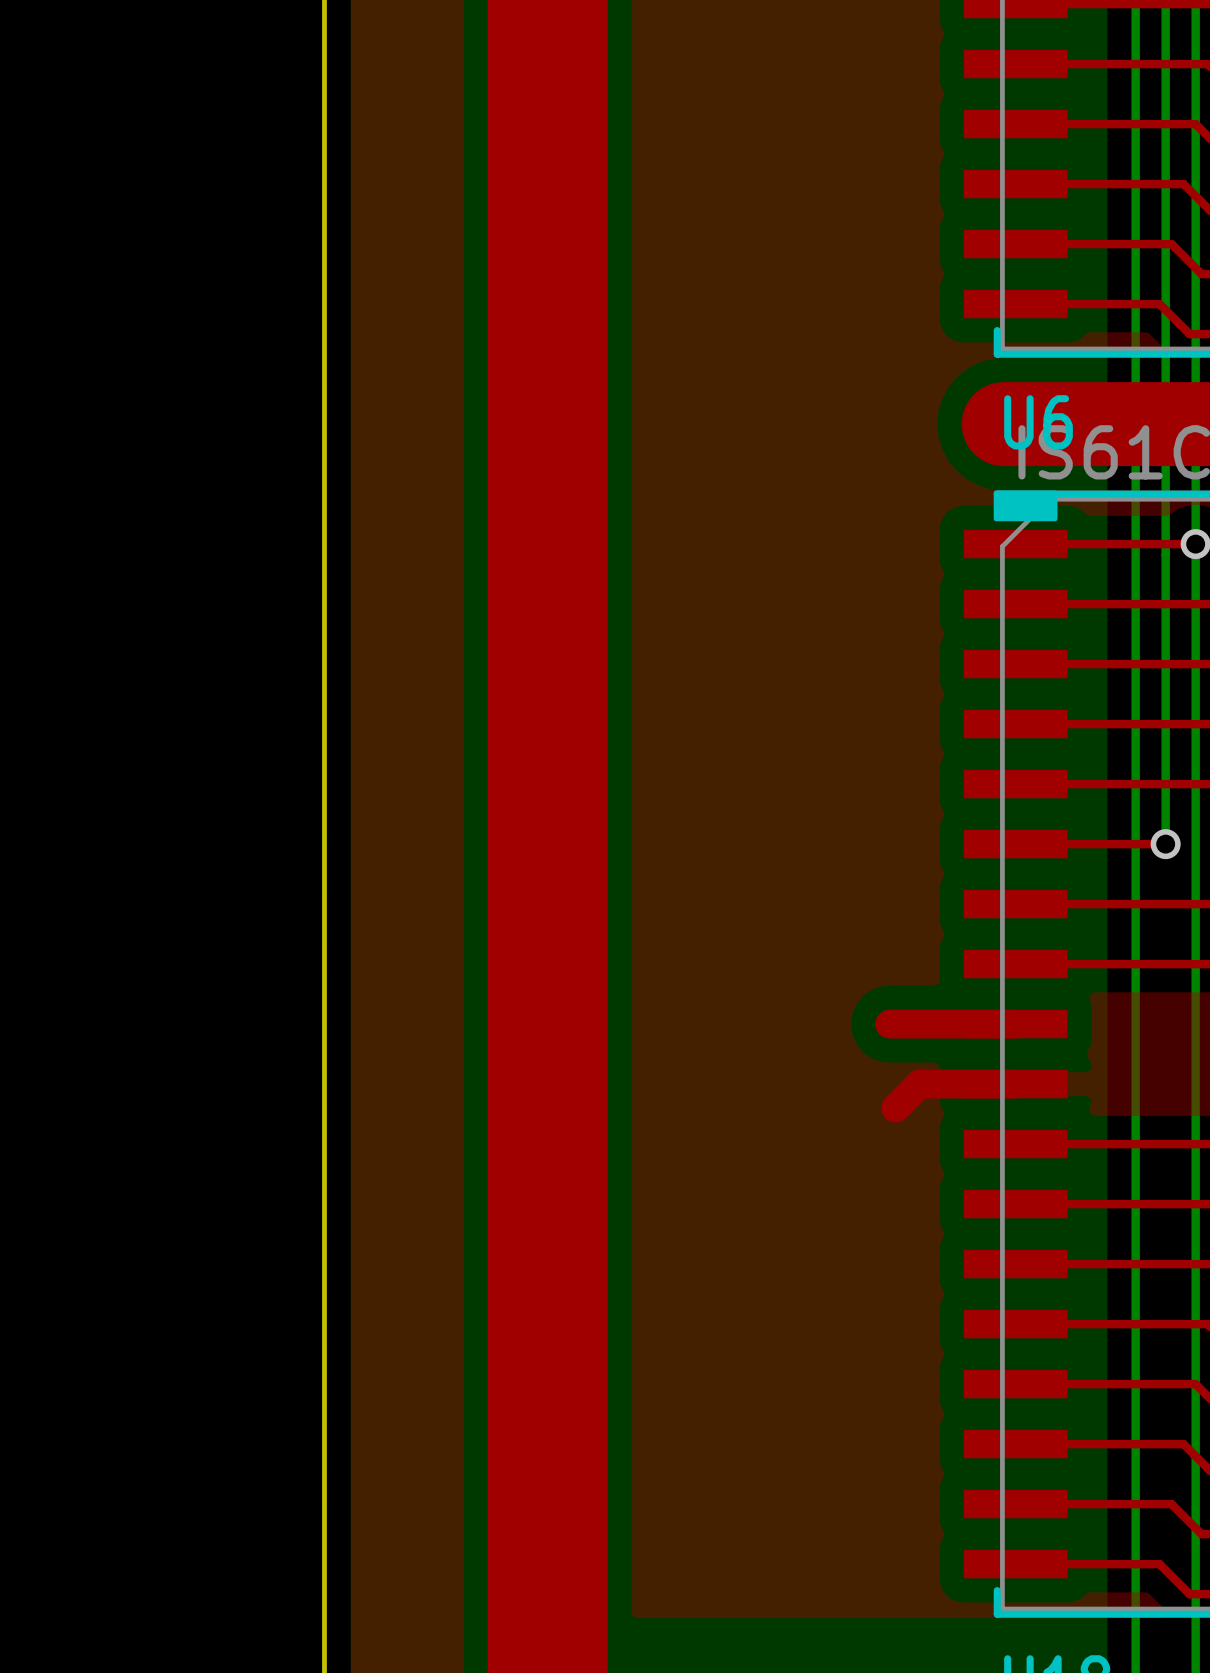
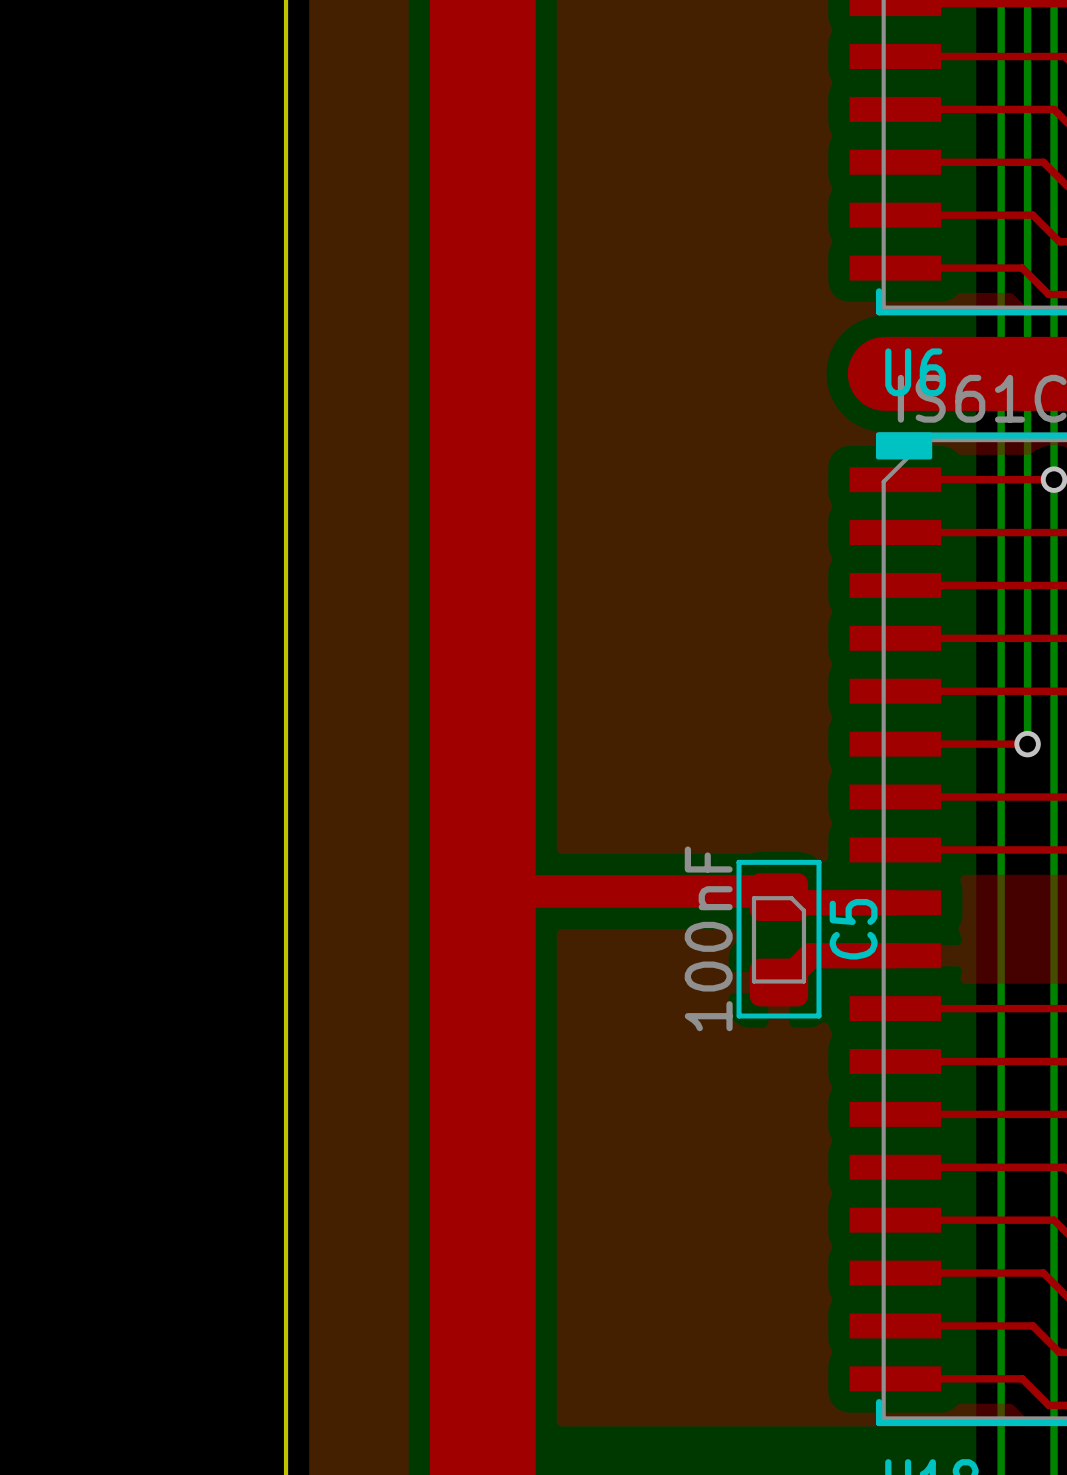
top track: none -> (487, 891) (778, 891)
C5: none -> 100nF (778, 939)

